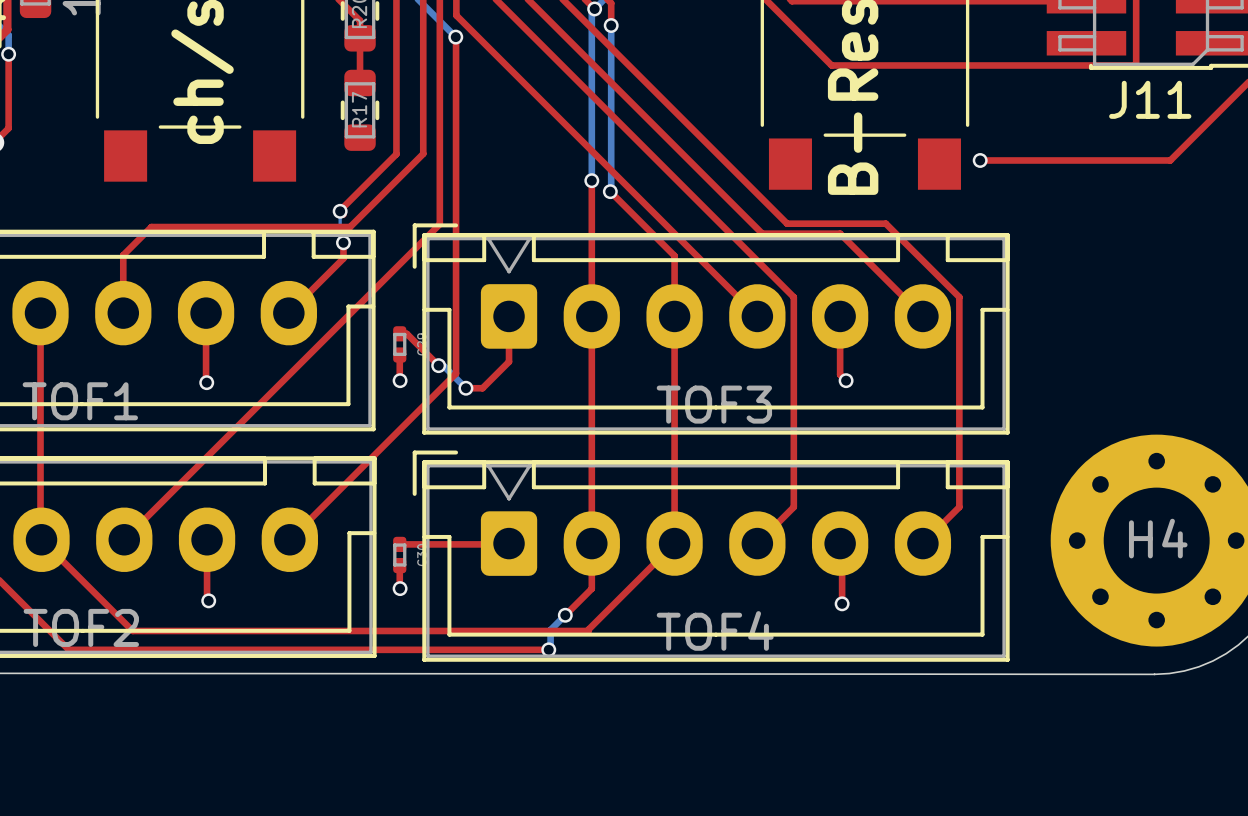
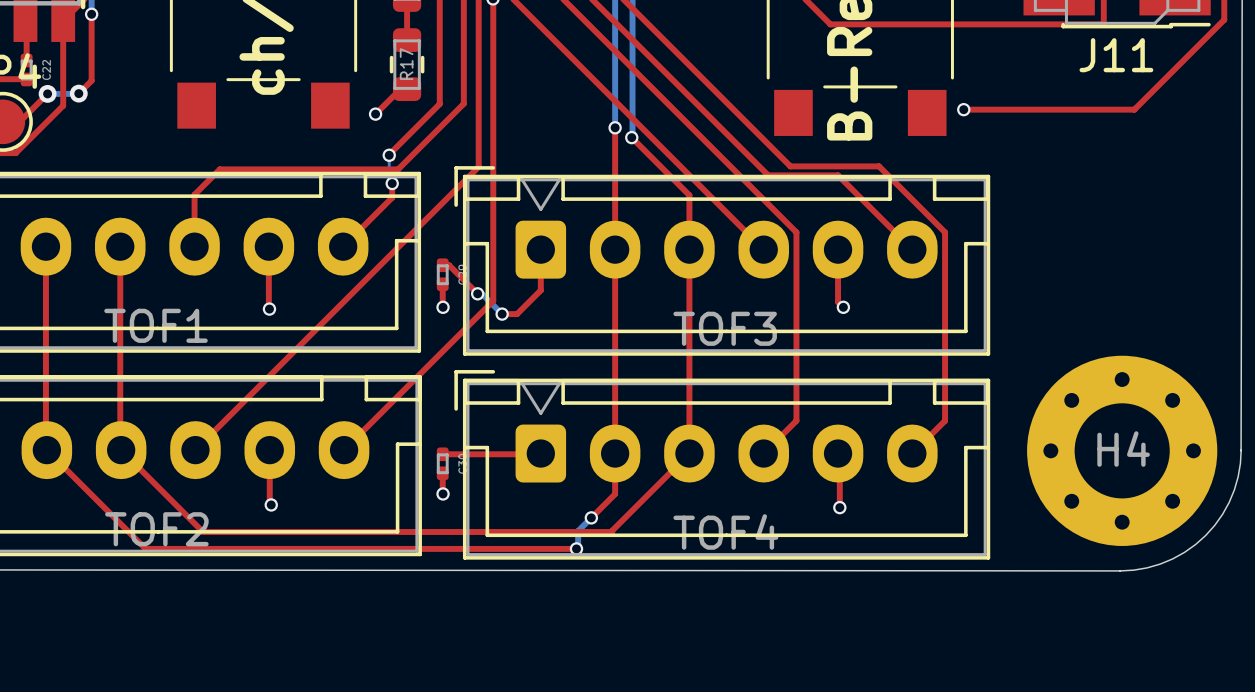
top track: none -> (407, 89) (400, 89) (375, 114)
via: none -> (375, 114)

